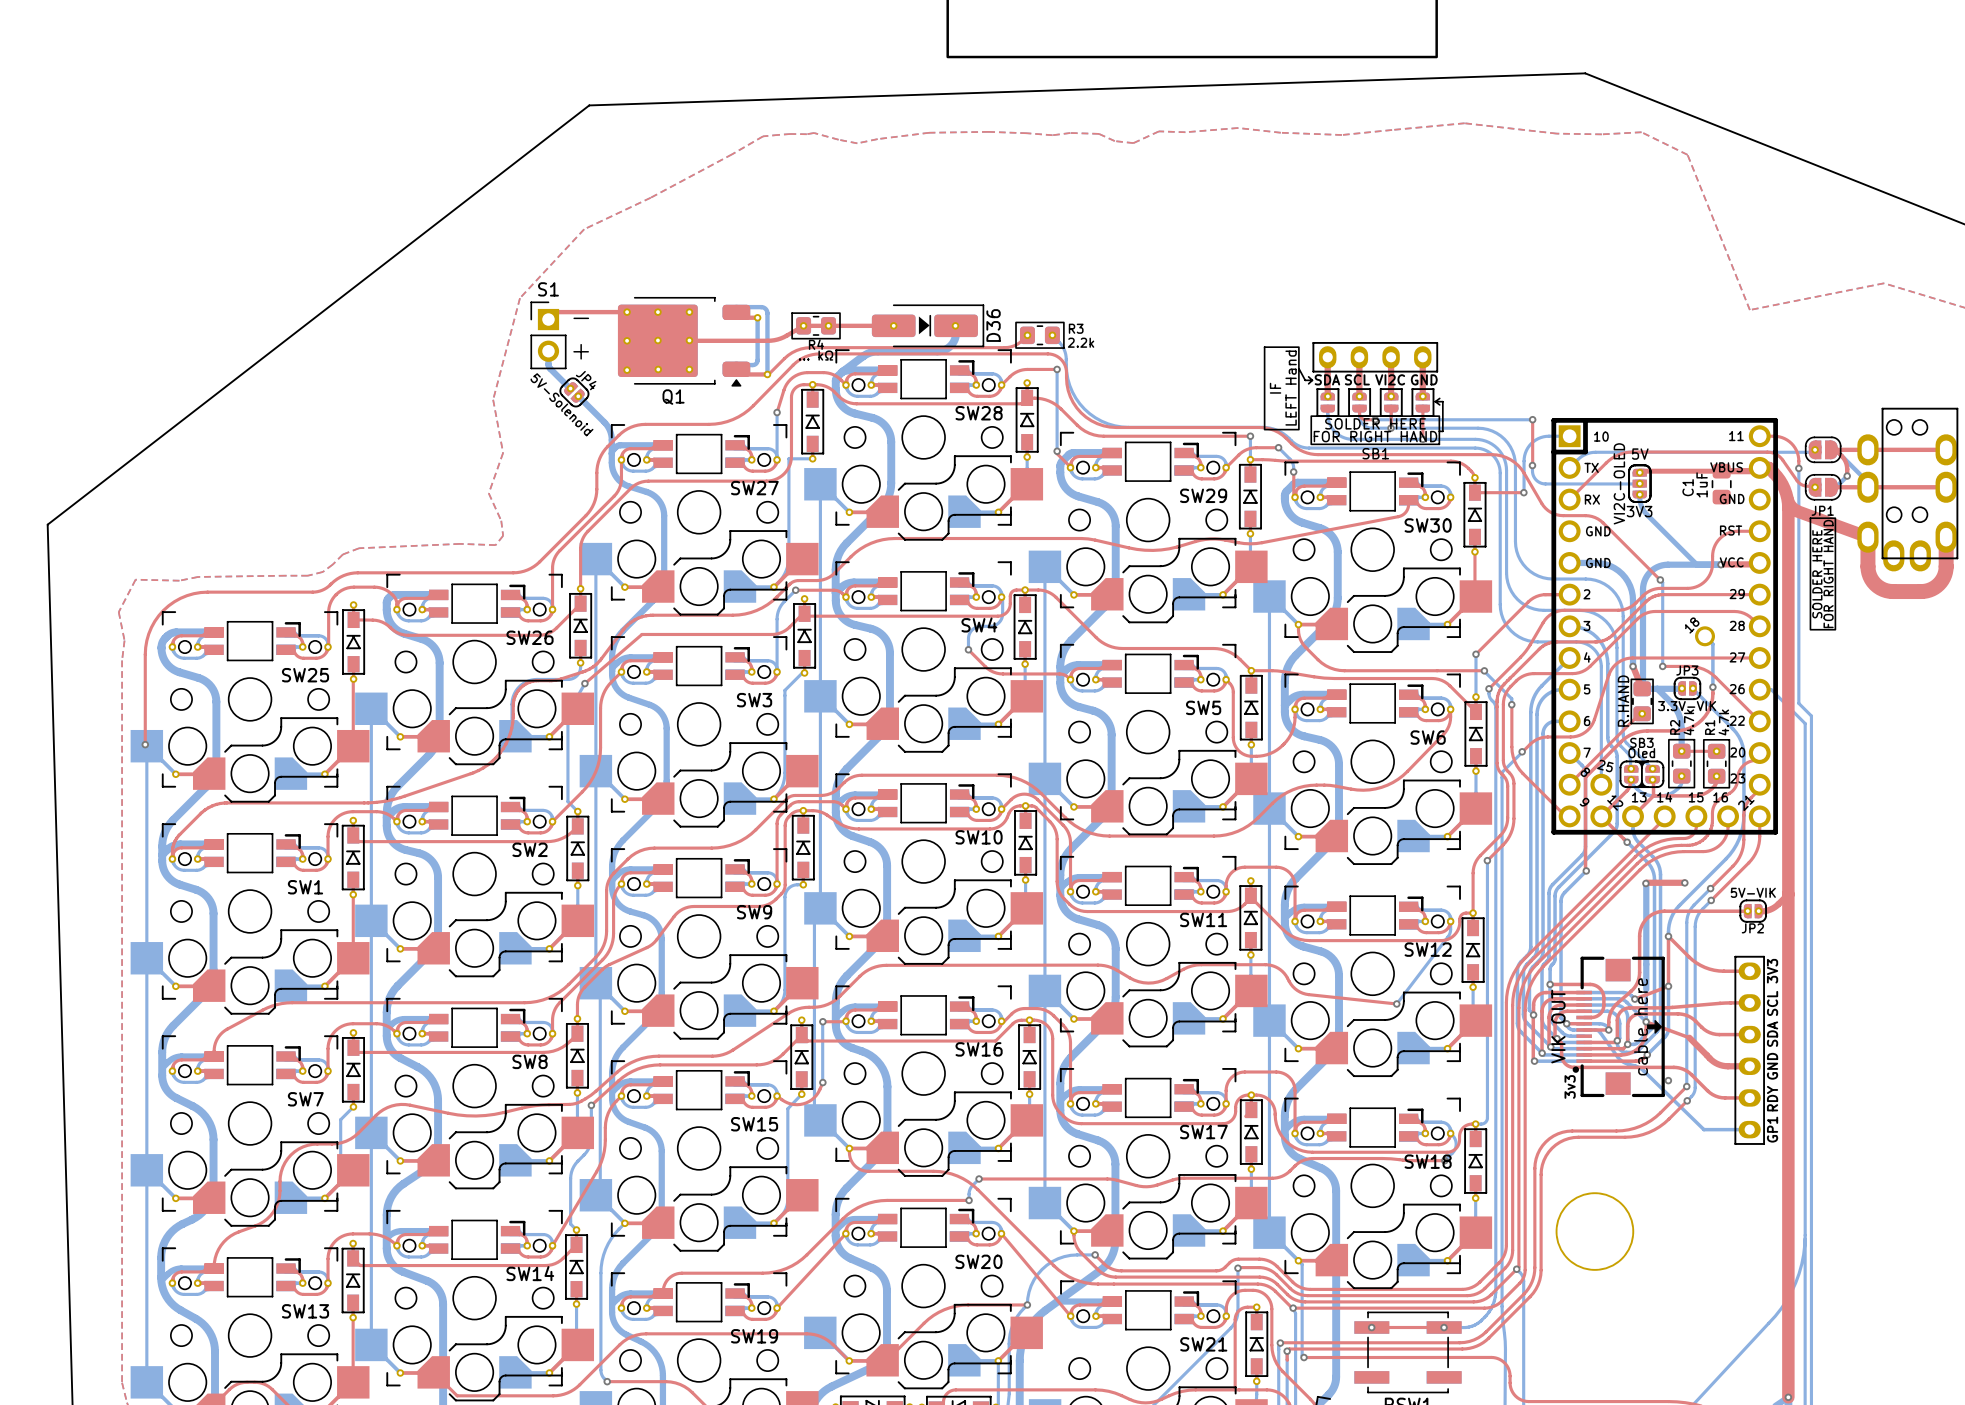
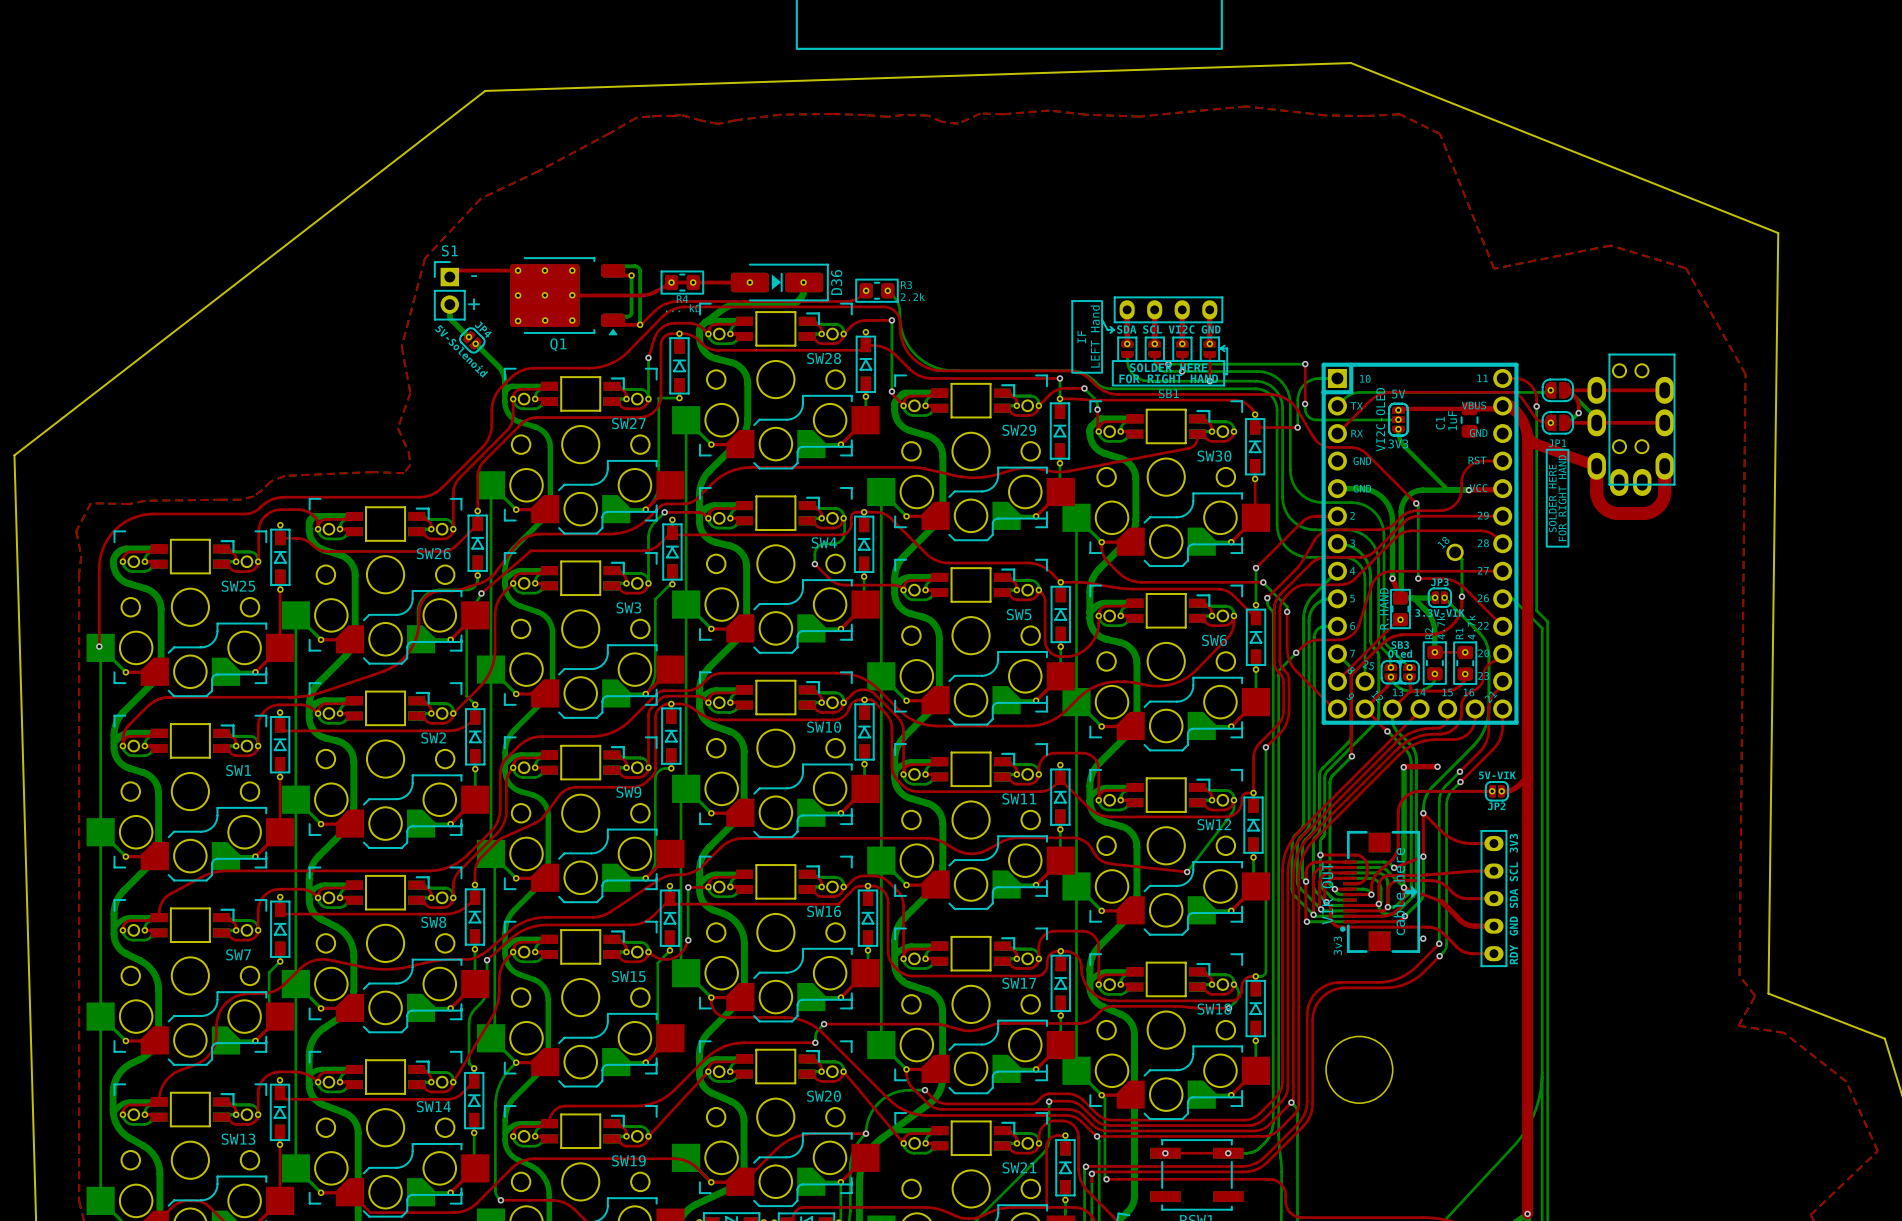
bottom track: (1584, 1029) (1599, 1031) (1620, 1059) (1641, 1069) (1703, 1129) (1749, 1129) -> none
part: none -> (1493, 898)
part: (1749, 1050) -> none

